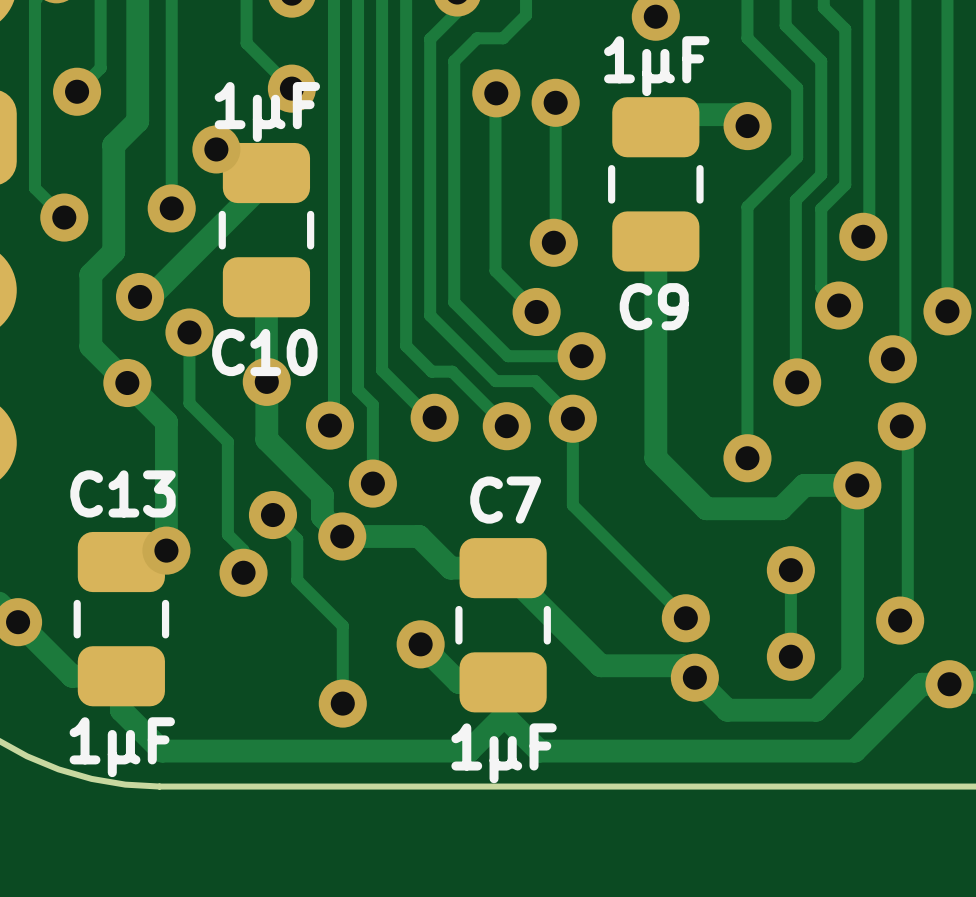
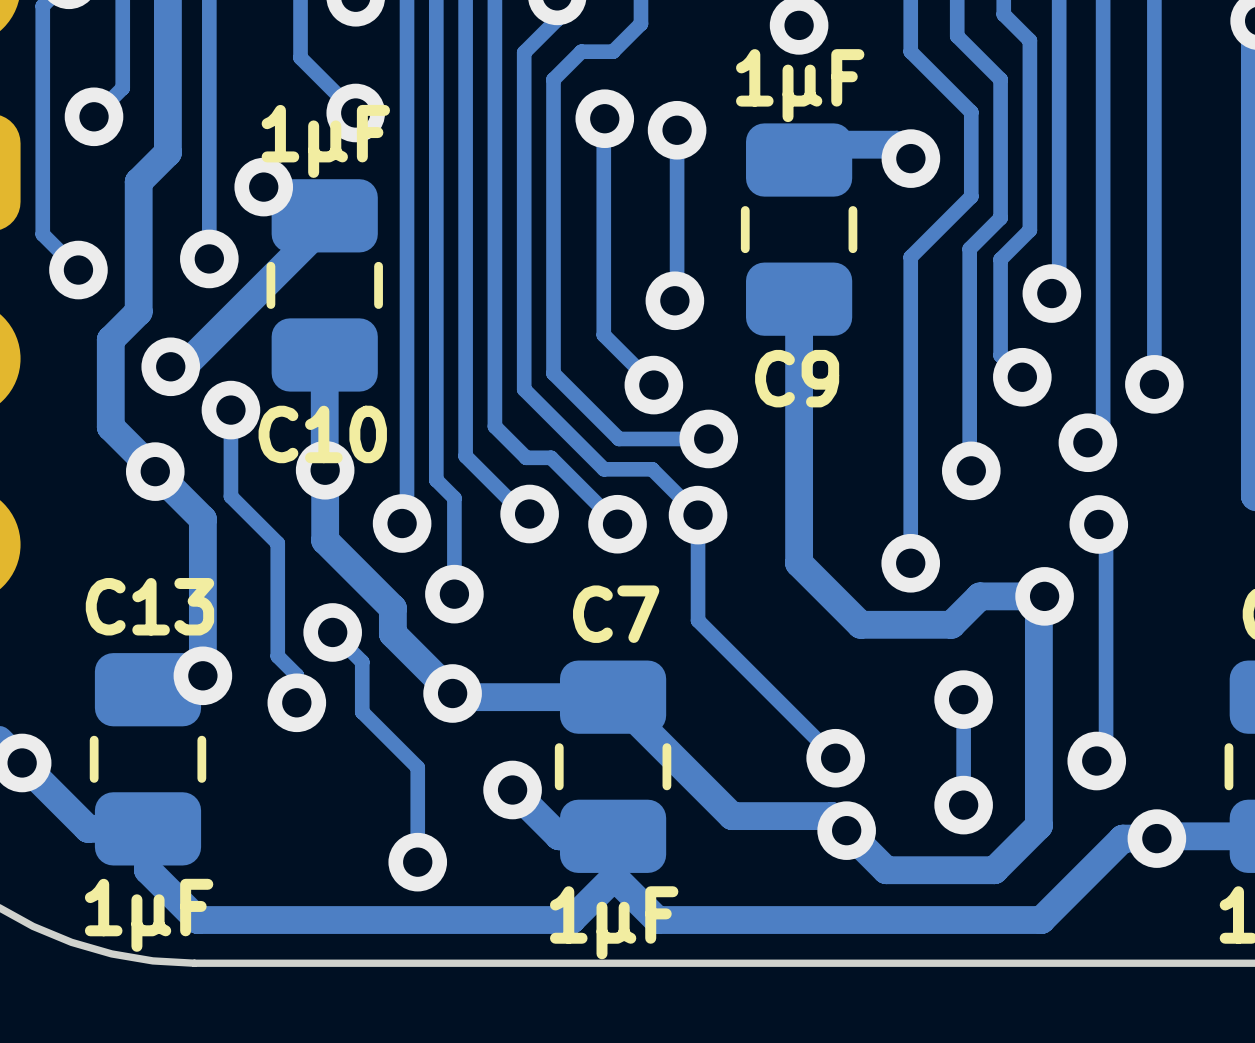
track: (322, 516) (342, 536) (419, 536) (450, 568) -> (392, 633) (456, 697) (549, 697)
via position: (342, 536) -> (452, 693)

